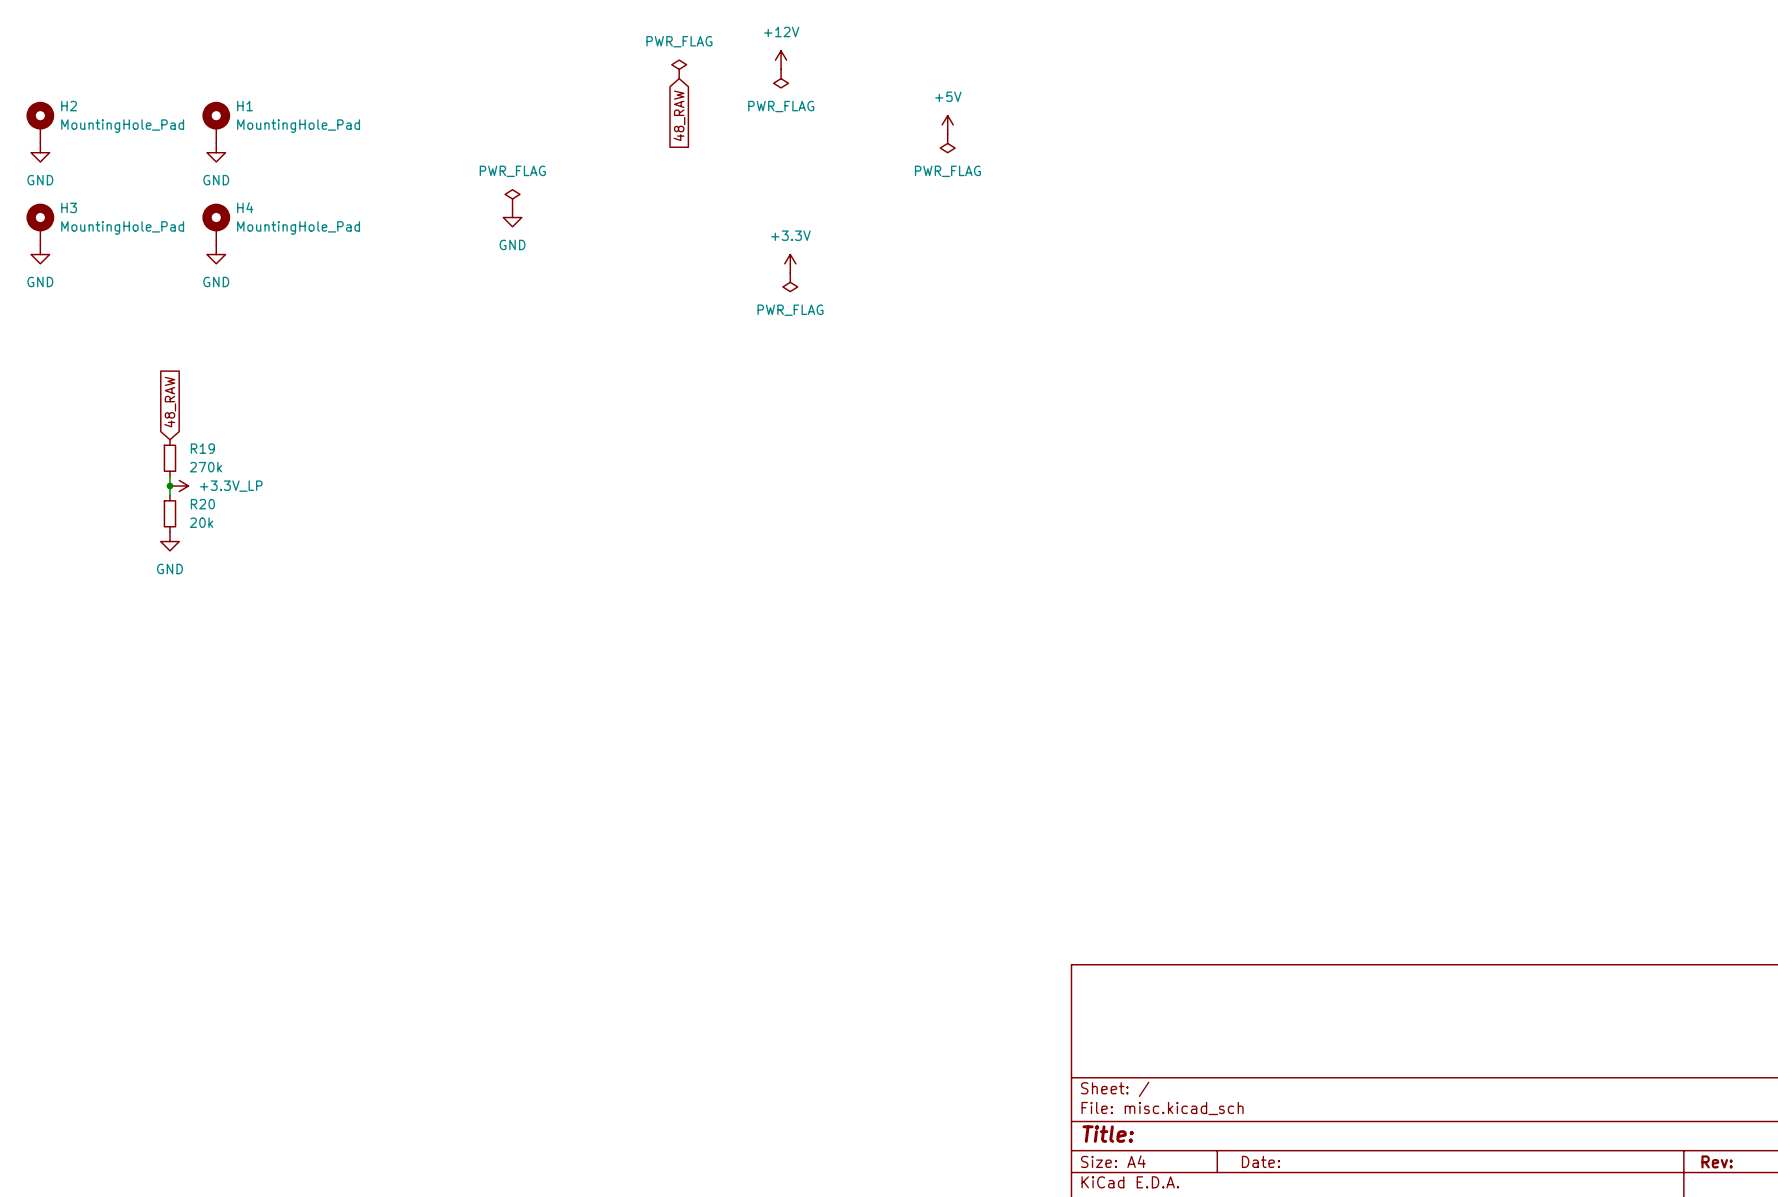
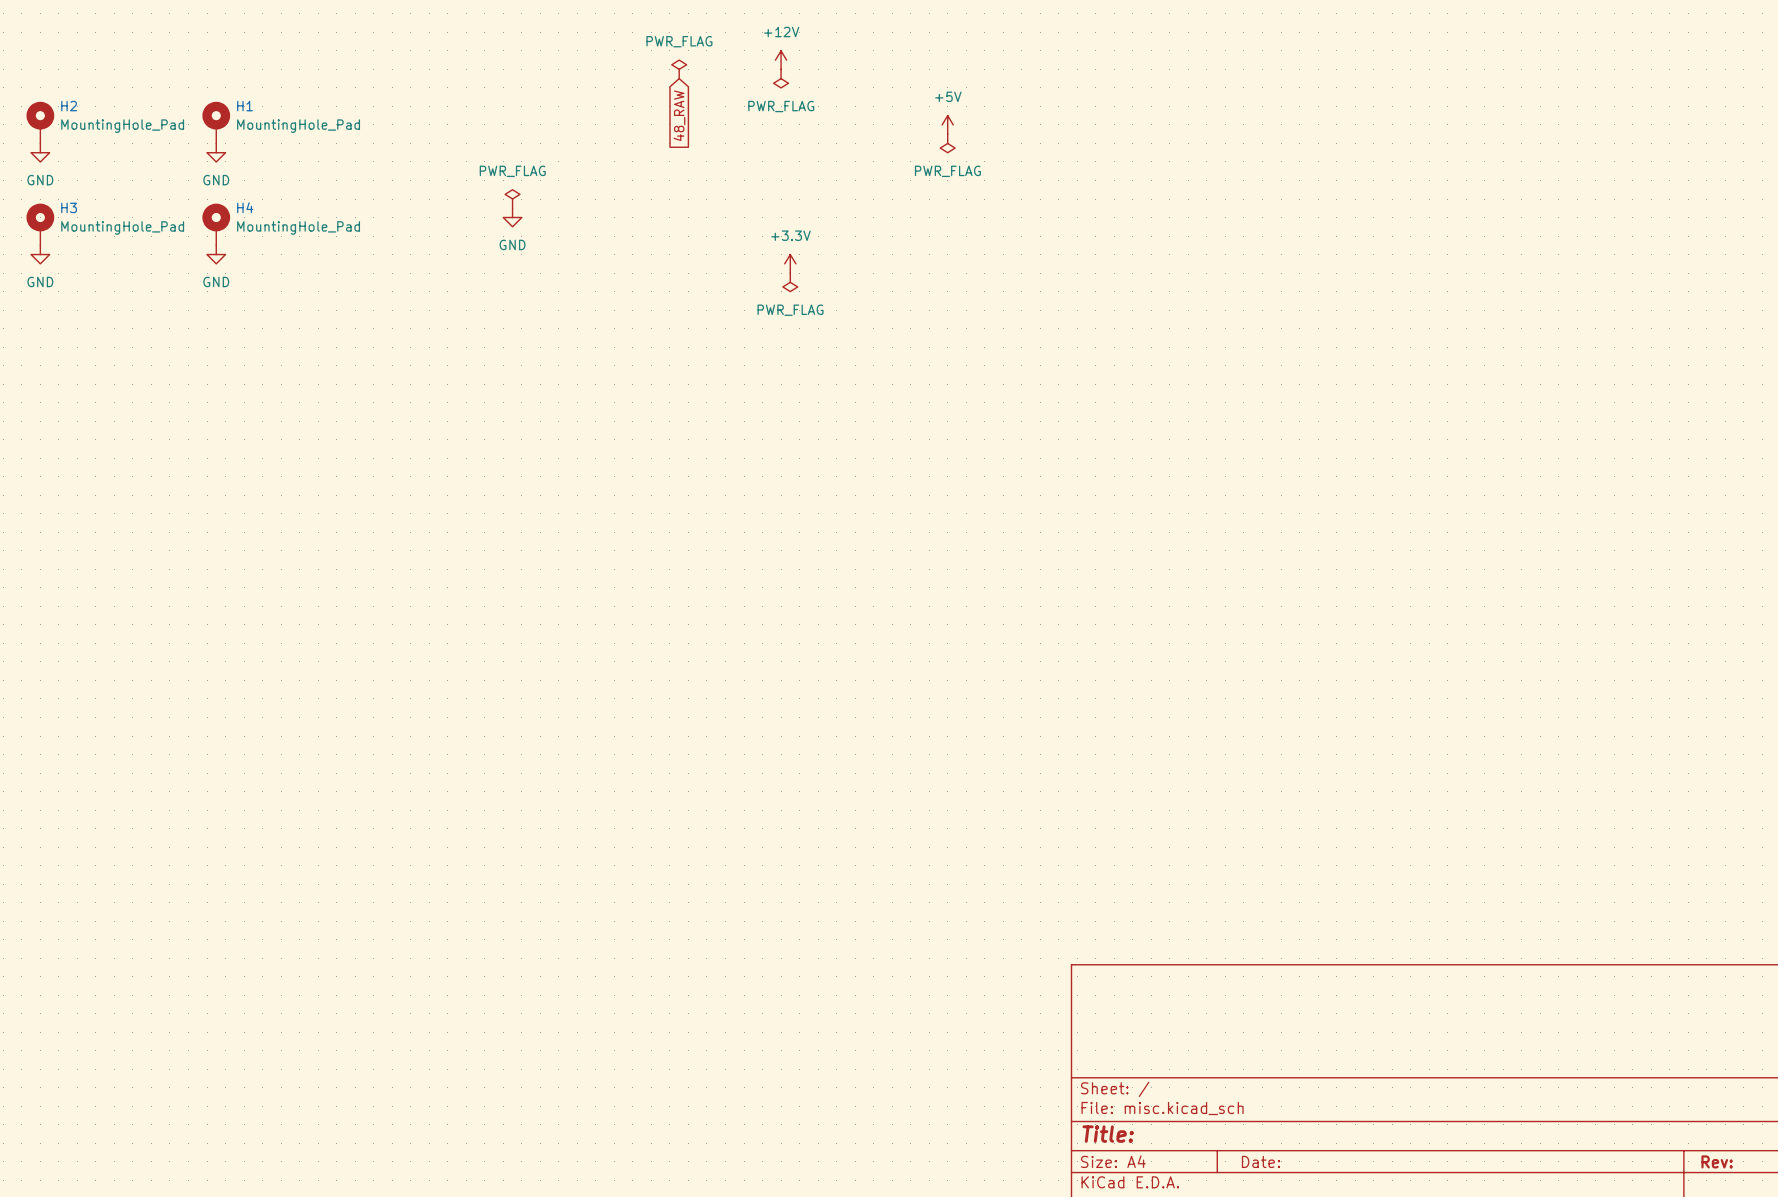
global label: 48_RAW (170, 402) -> none
R19: 270k (169, 458) -> none
wire: (169, 476) (169, 495) -> none
junction: (169, 486) -> none
power symbol: +3.3V_LP (179, 486) -> none
R20: 20k (169, 513) -> none
power symbol: GND (169, 541) -> none

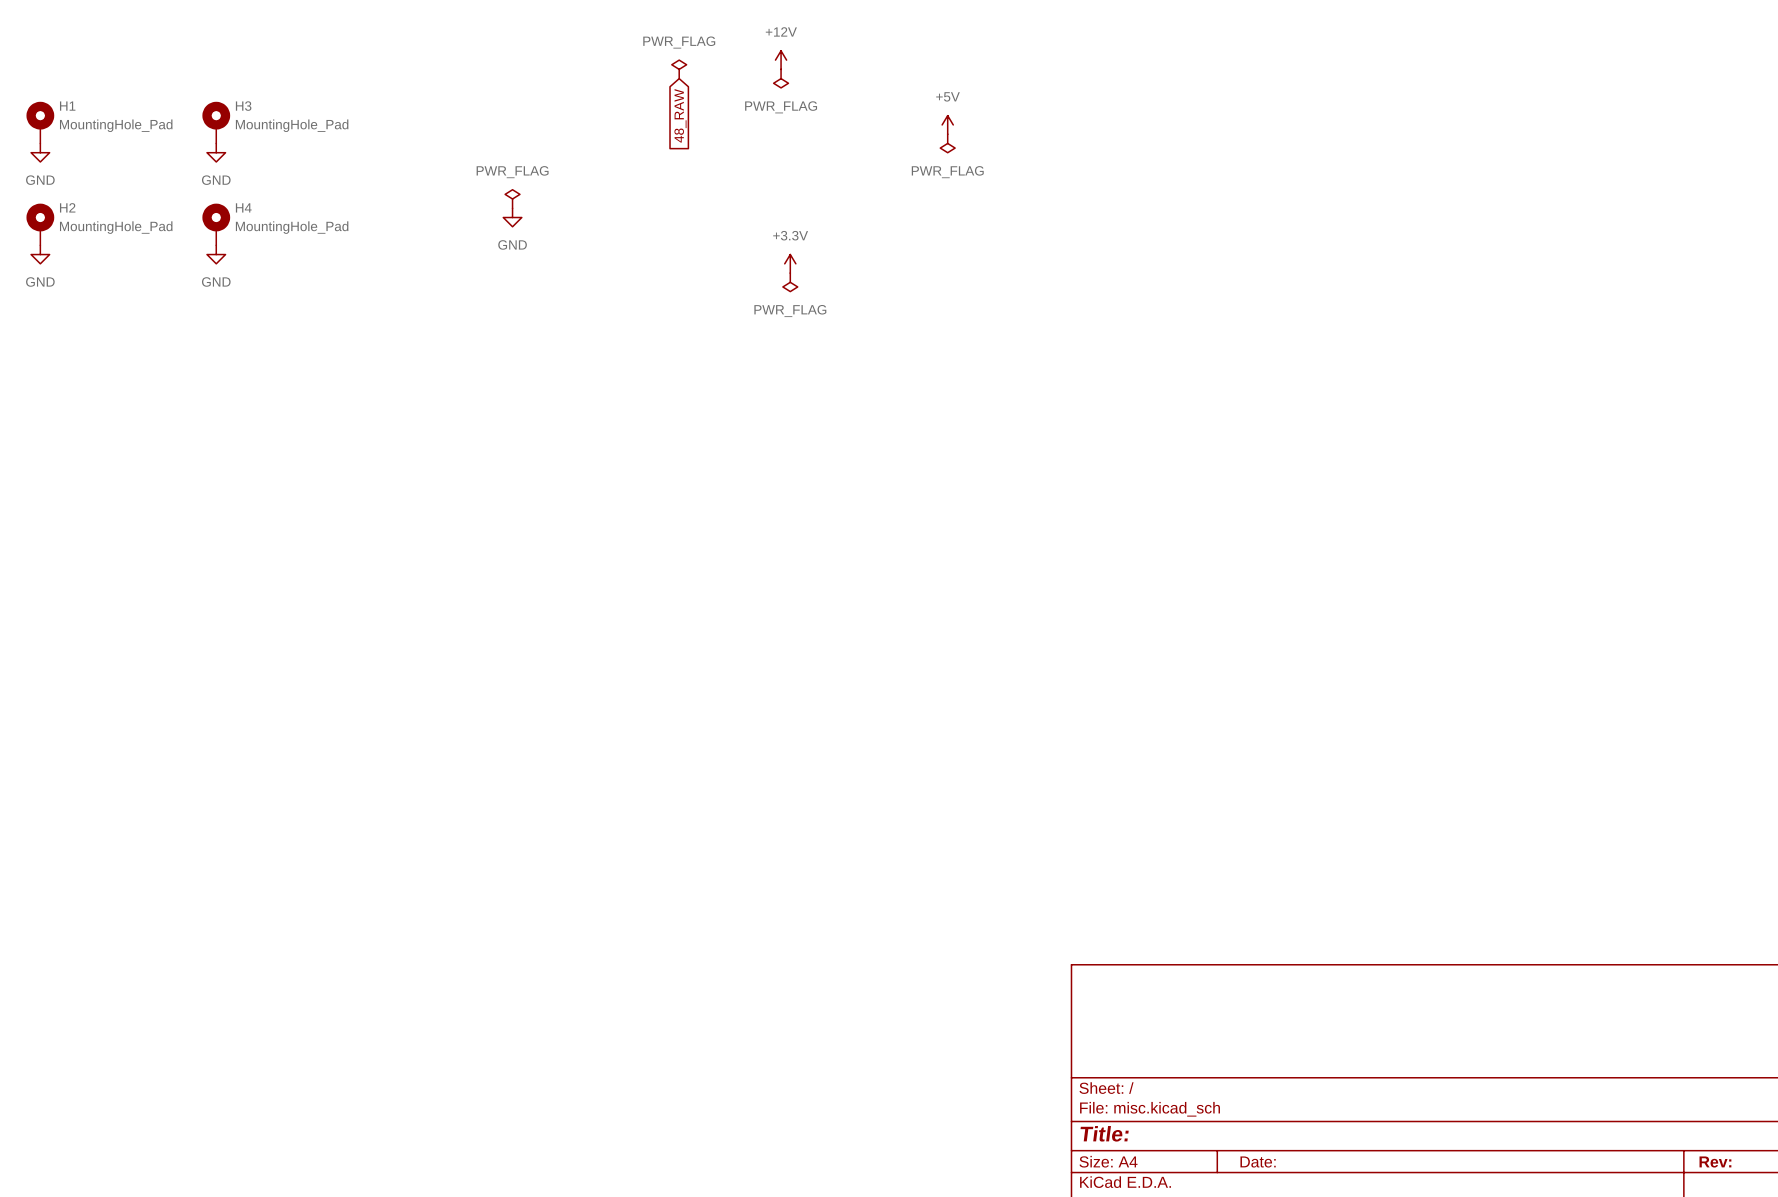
H2 name: H2 (69, 106) -> H1 (67, 106)
H1 name: H1 (244, 106) -> H3 (243, 106)
H3 name: H3 (69, 207) -> H2 (67, 207)

